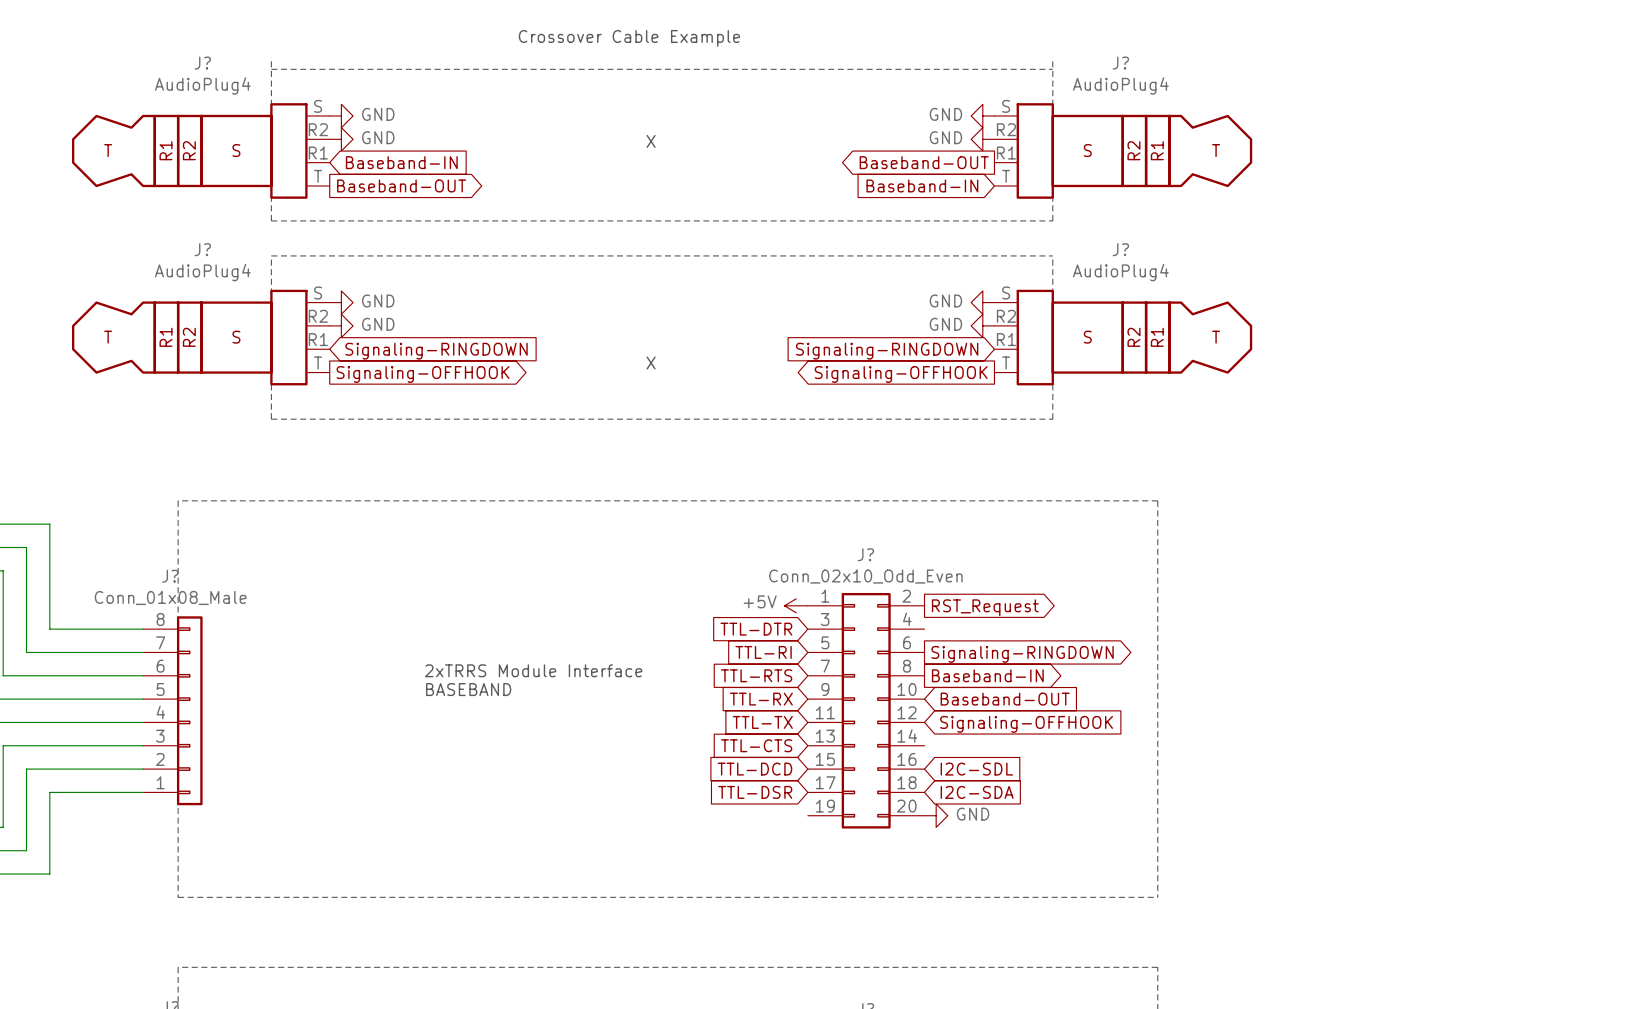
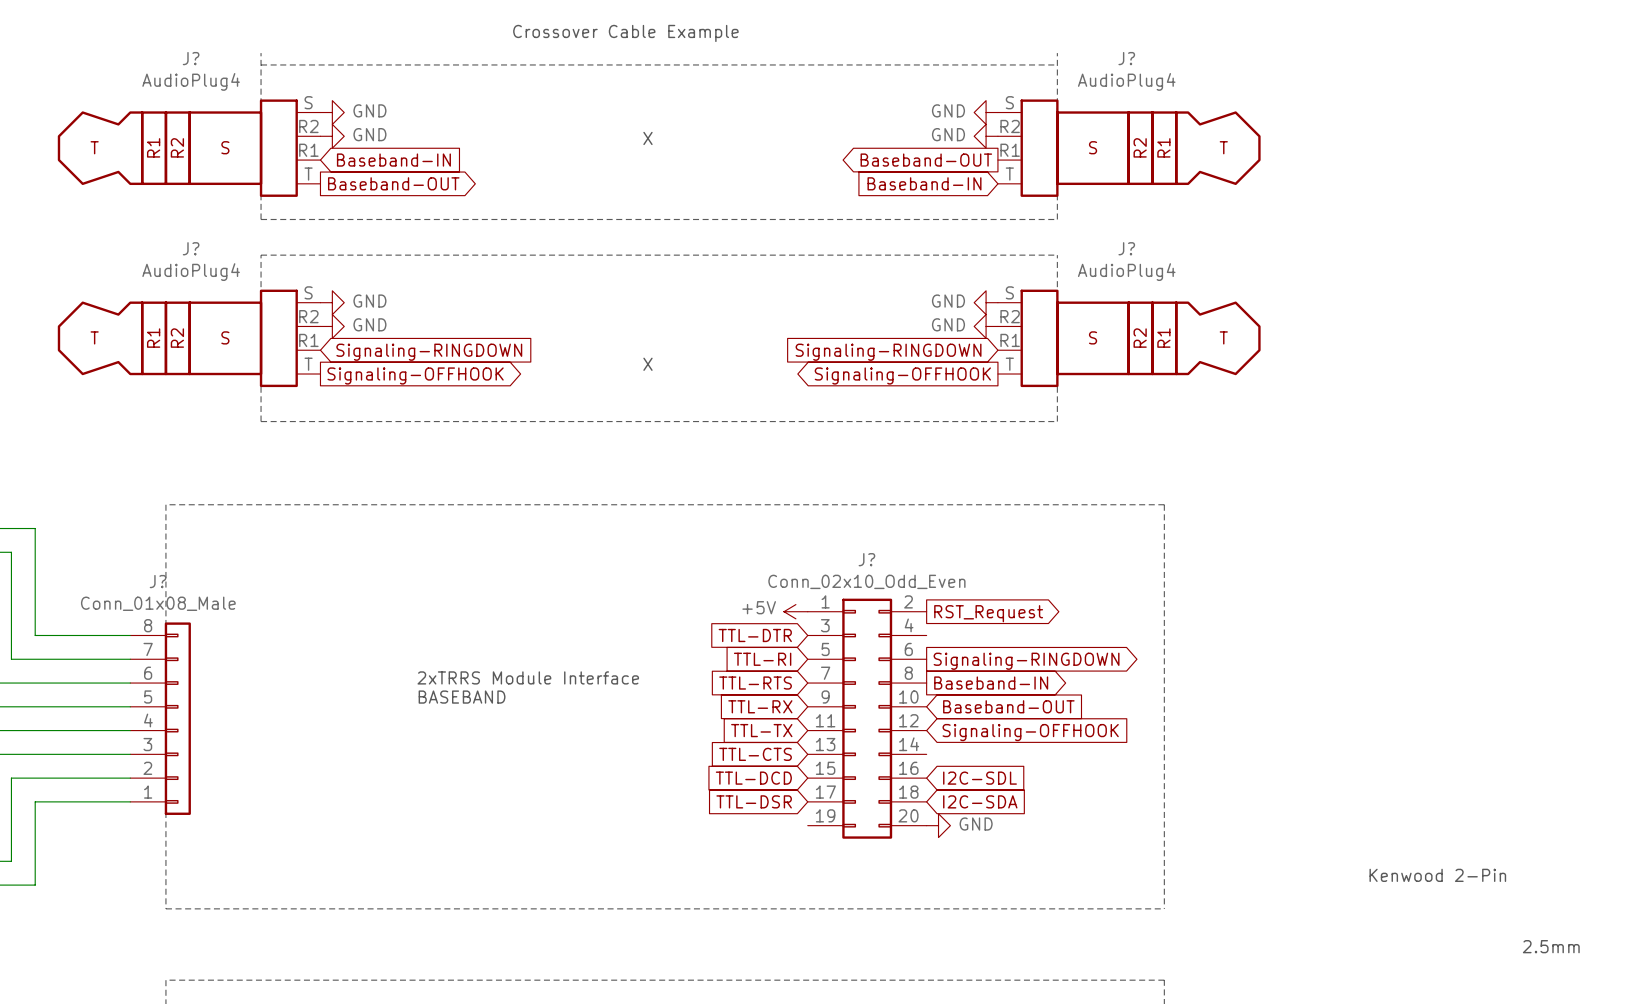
text: none -> Kenwood 2-Pin (1437, 875)
text: none -> 2.5mm (1551, 946)

